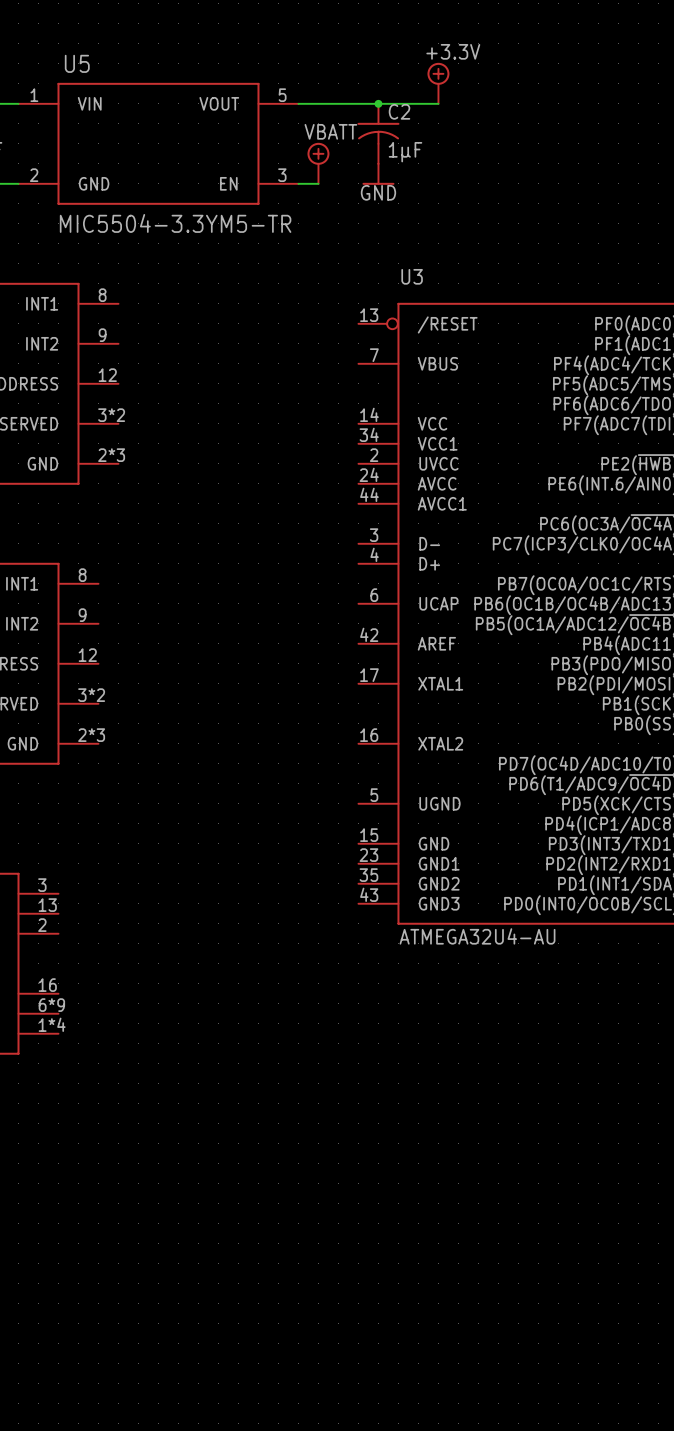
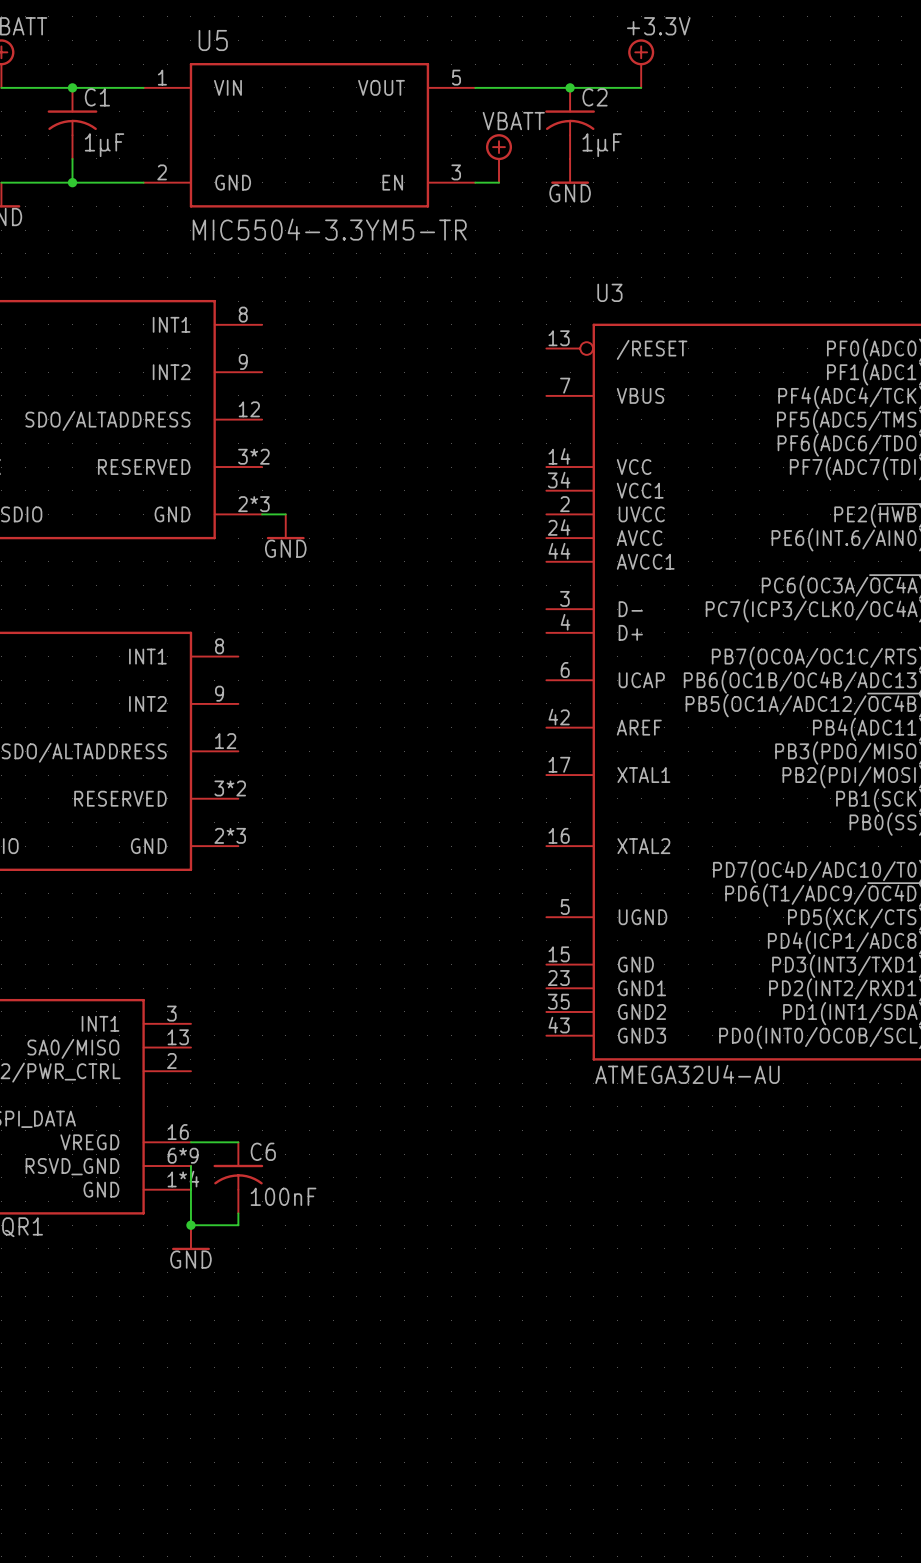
wire: none -> (262, 514) (285, 514)
power symbol: none -> GND (285, 526)
wire: none -> (190, 1142) (238, 1142)
wire: none -> (190, 1166) (190, 1225) (238, 1225) (238, 1213)
C6: none -> 100nF (238, 1177)
junction: none -> (190, 1225)
power symbol: none -> GND (190, 1237)

